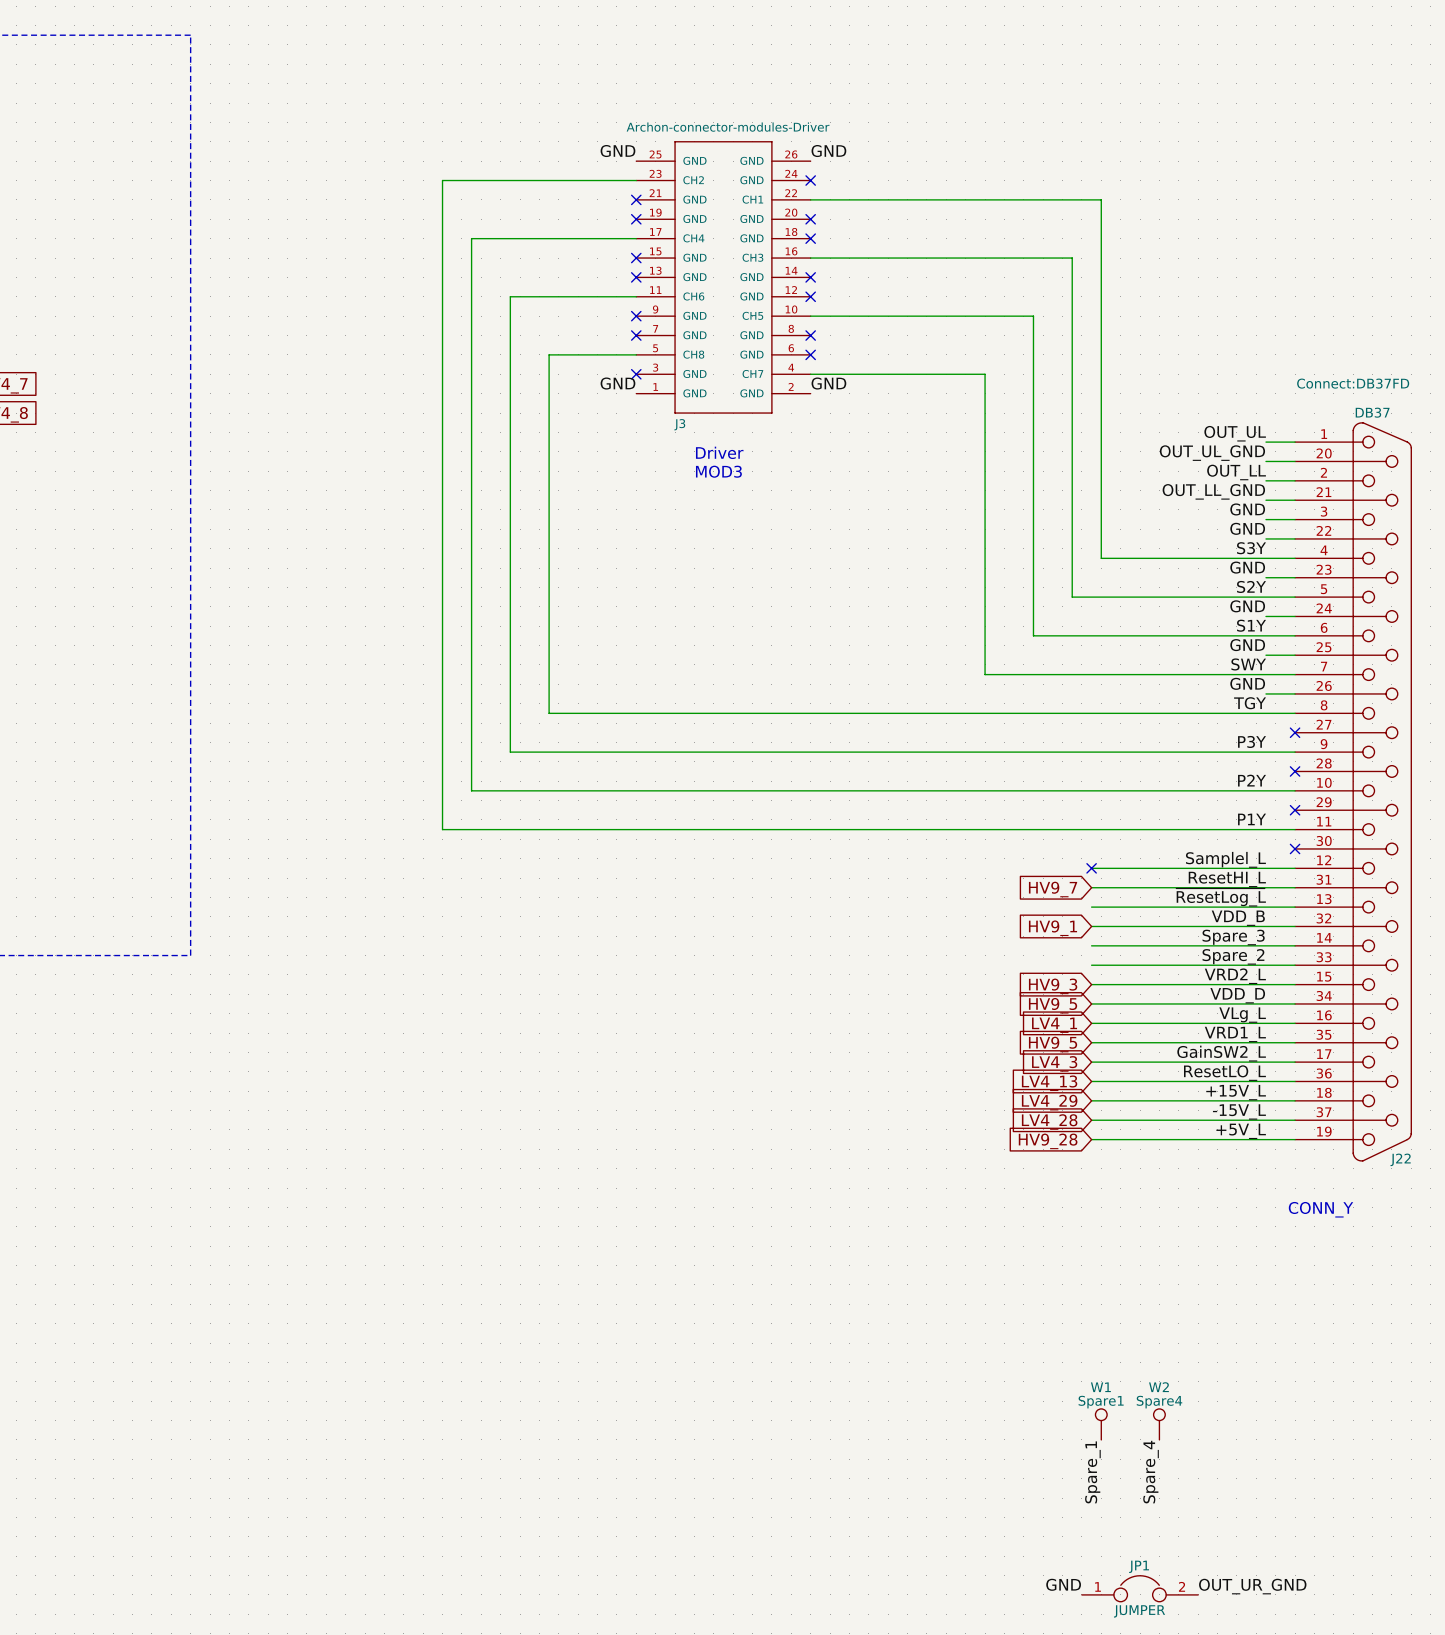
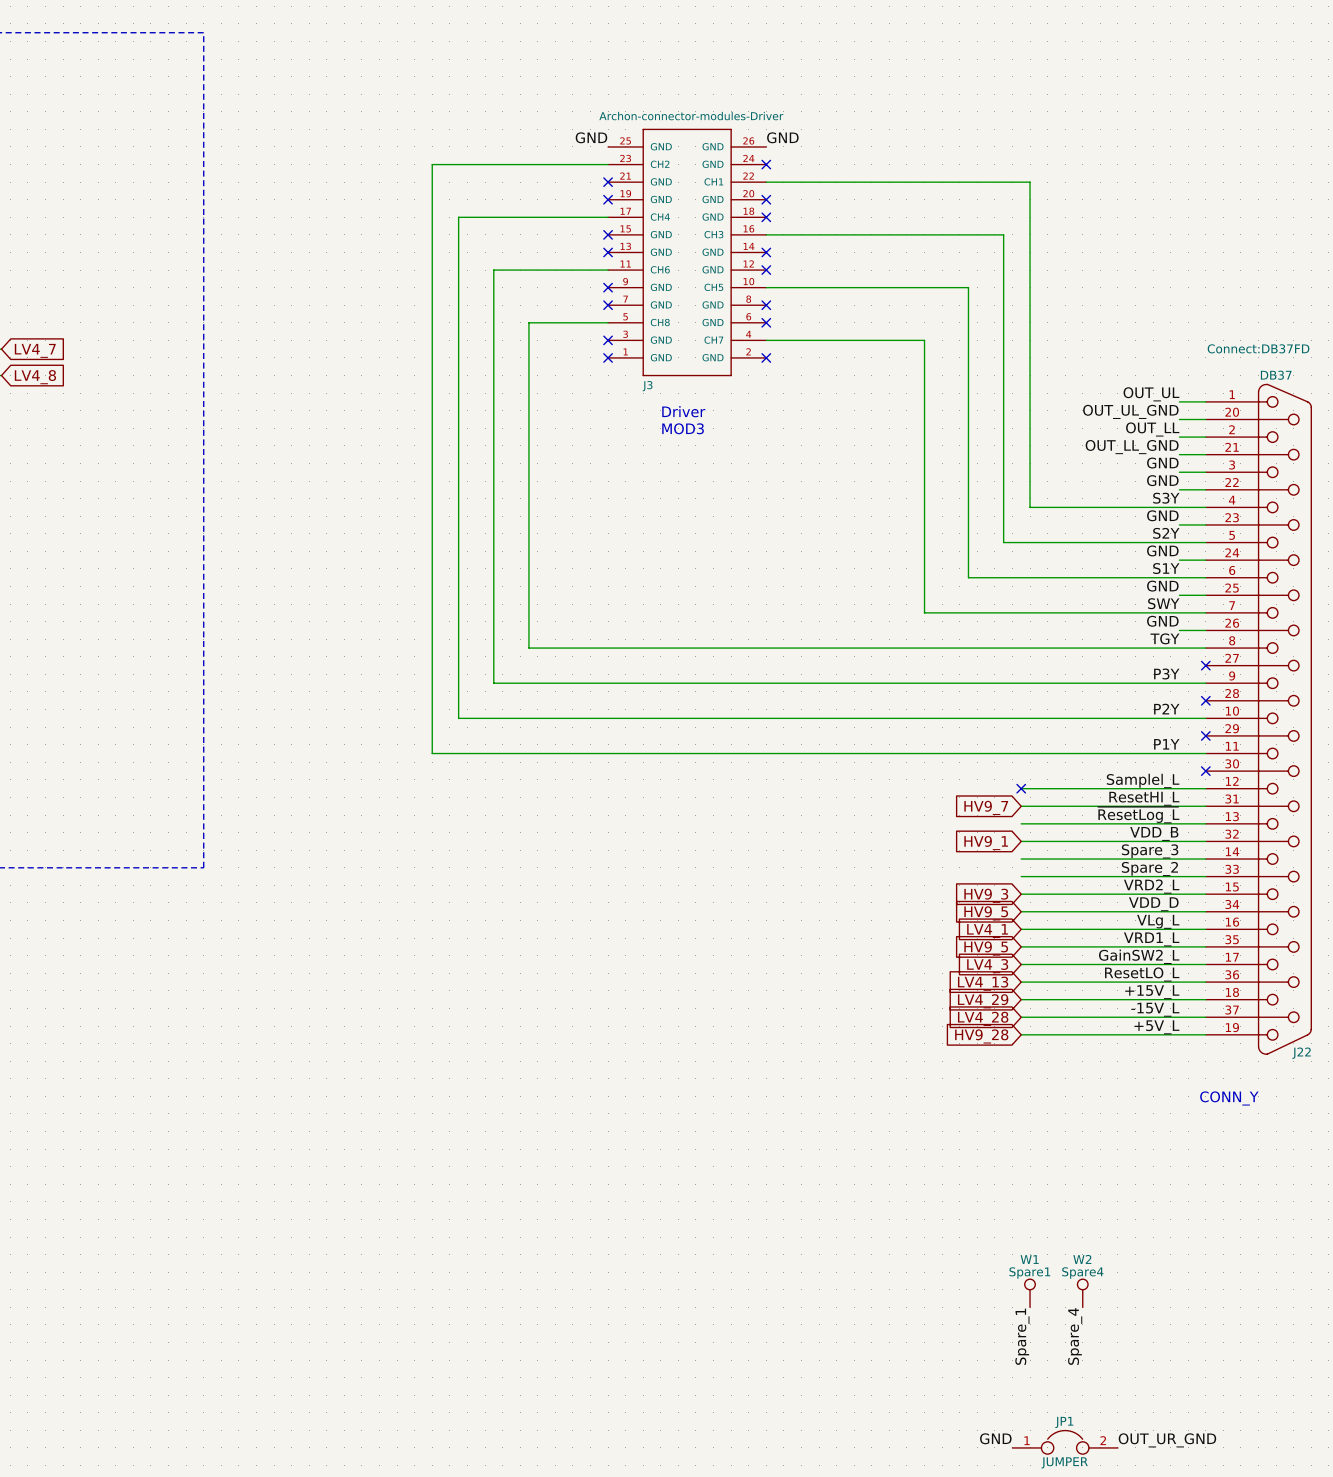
label: GND (617, 383) -> none
label: GND (828, 383) -> none
no-connect mark: none -> (608, 357)
no-connect mark: none -> (766, 357)

